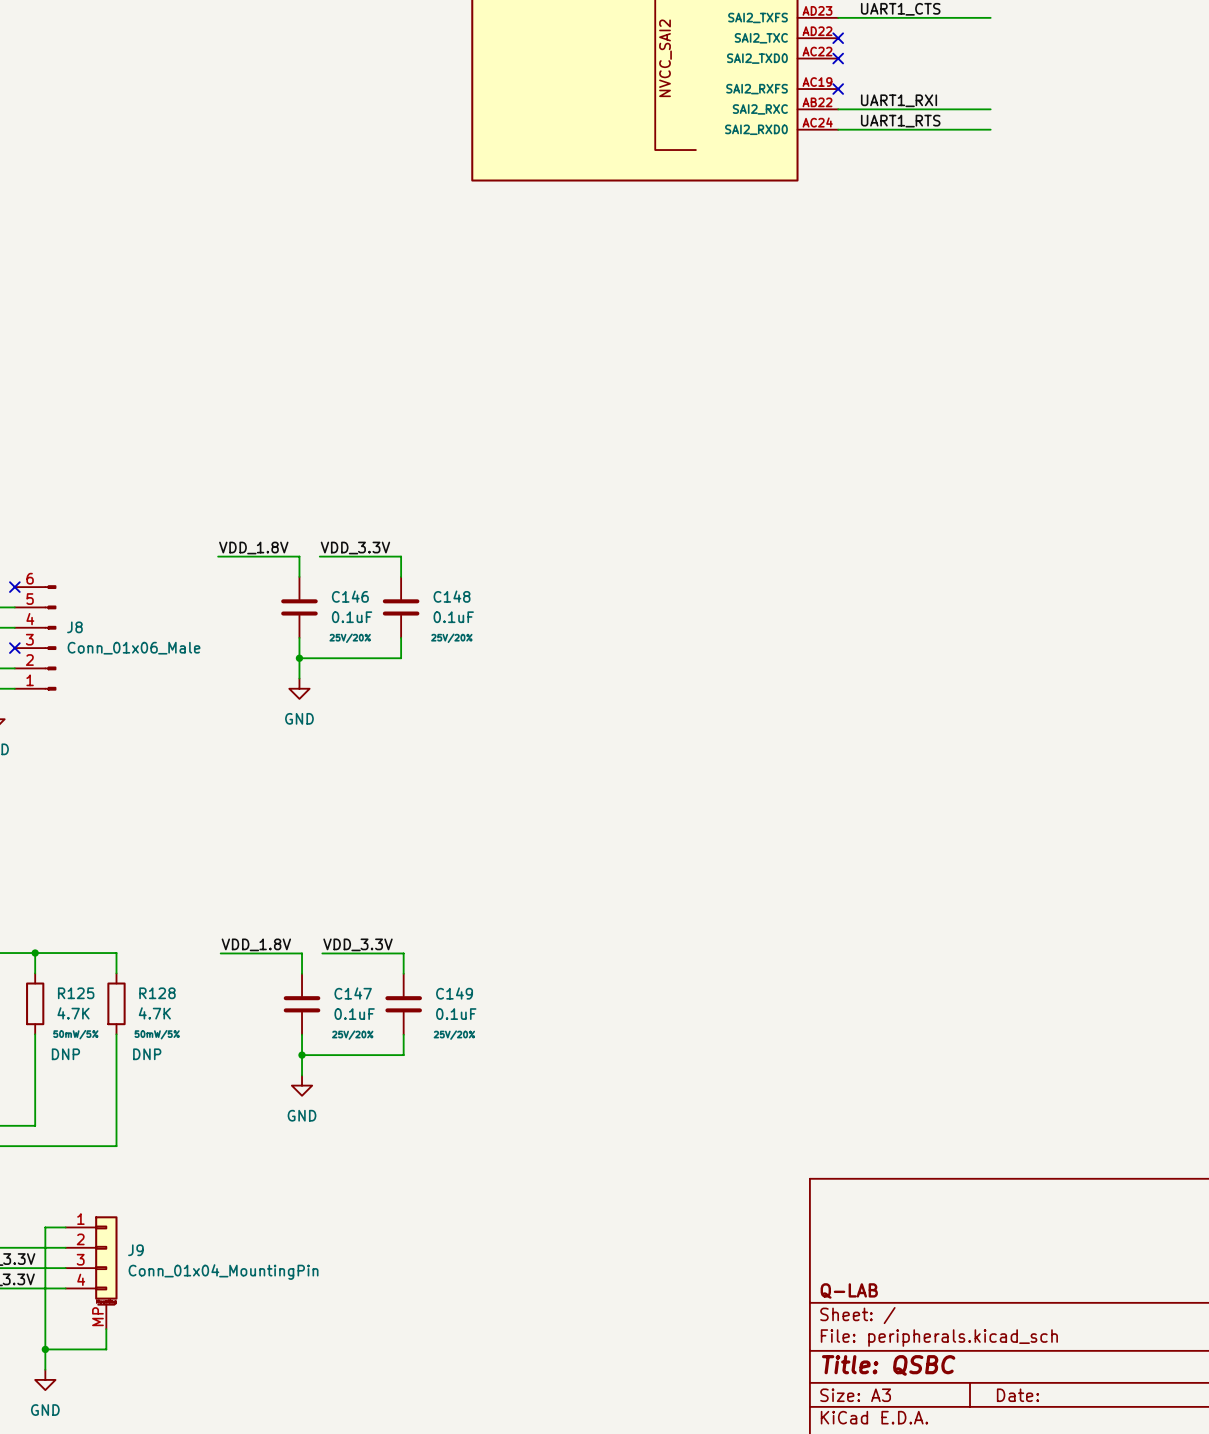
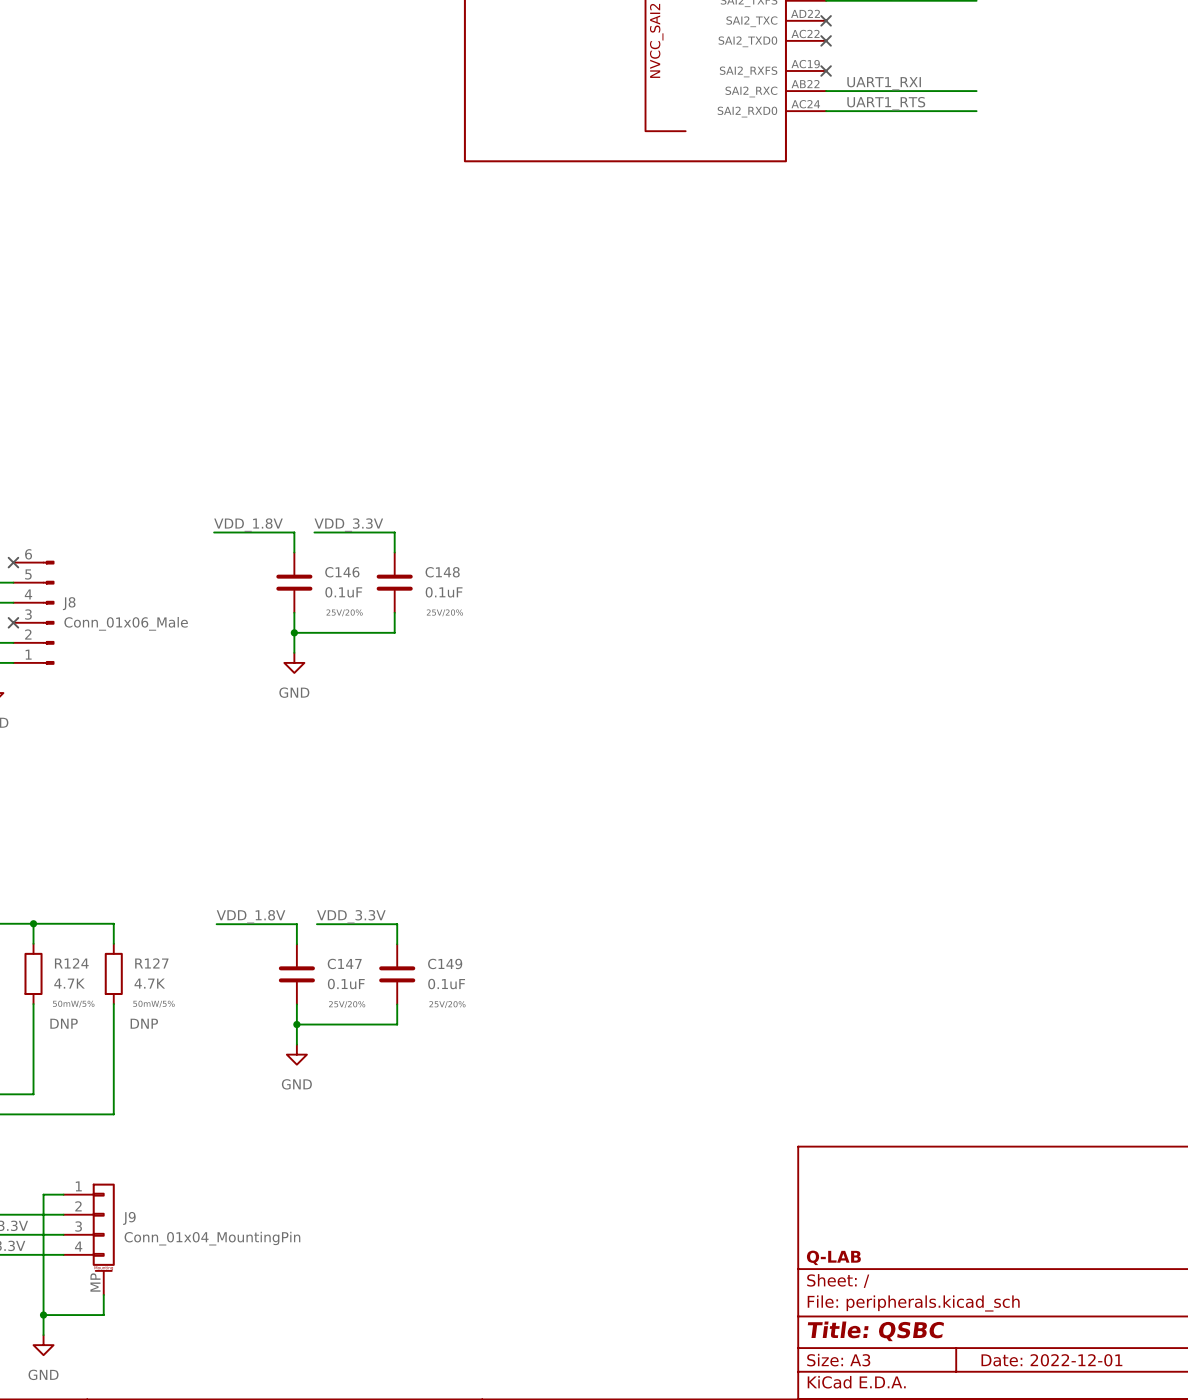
R125 name: R125 (76, 993) -> R124 (71, 963)
R128 name: R128 (157, 993) -> R127 (151, 963)
title block: Date: (1017, 1395) -> Date: 2022-12-01 (1051, 1360)

